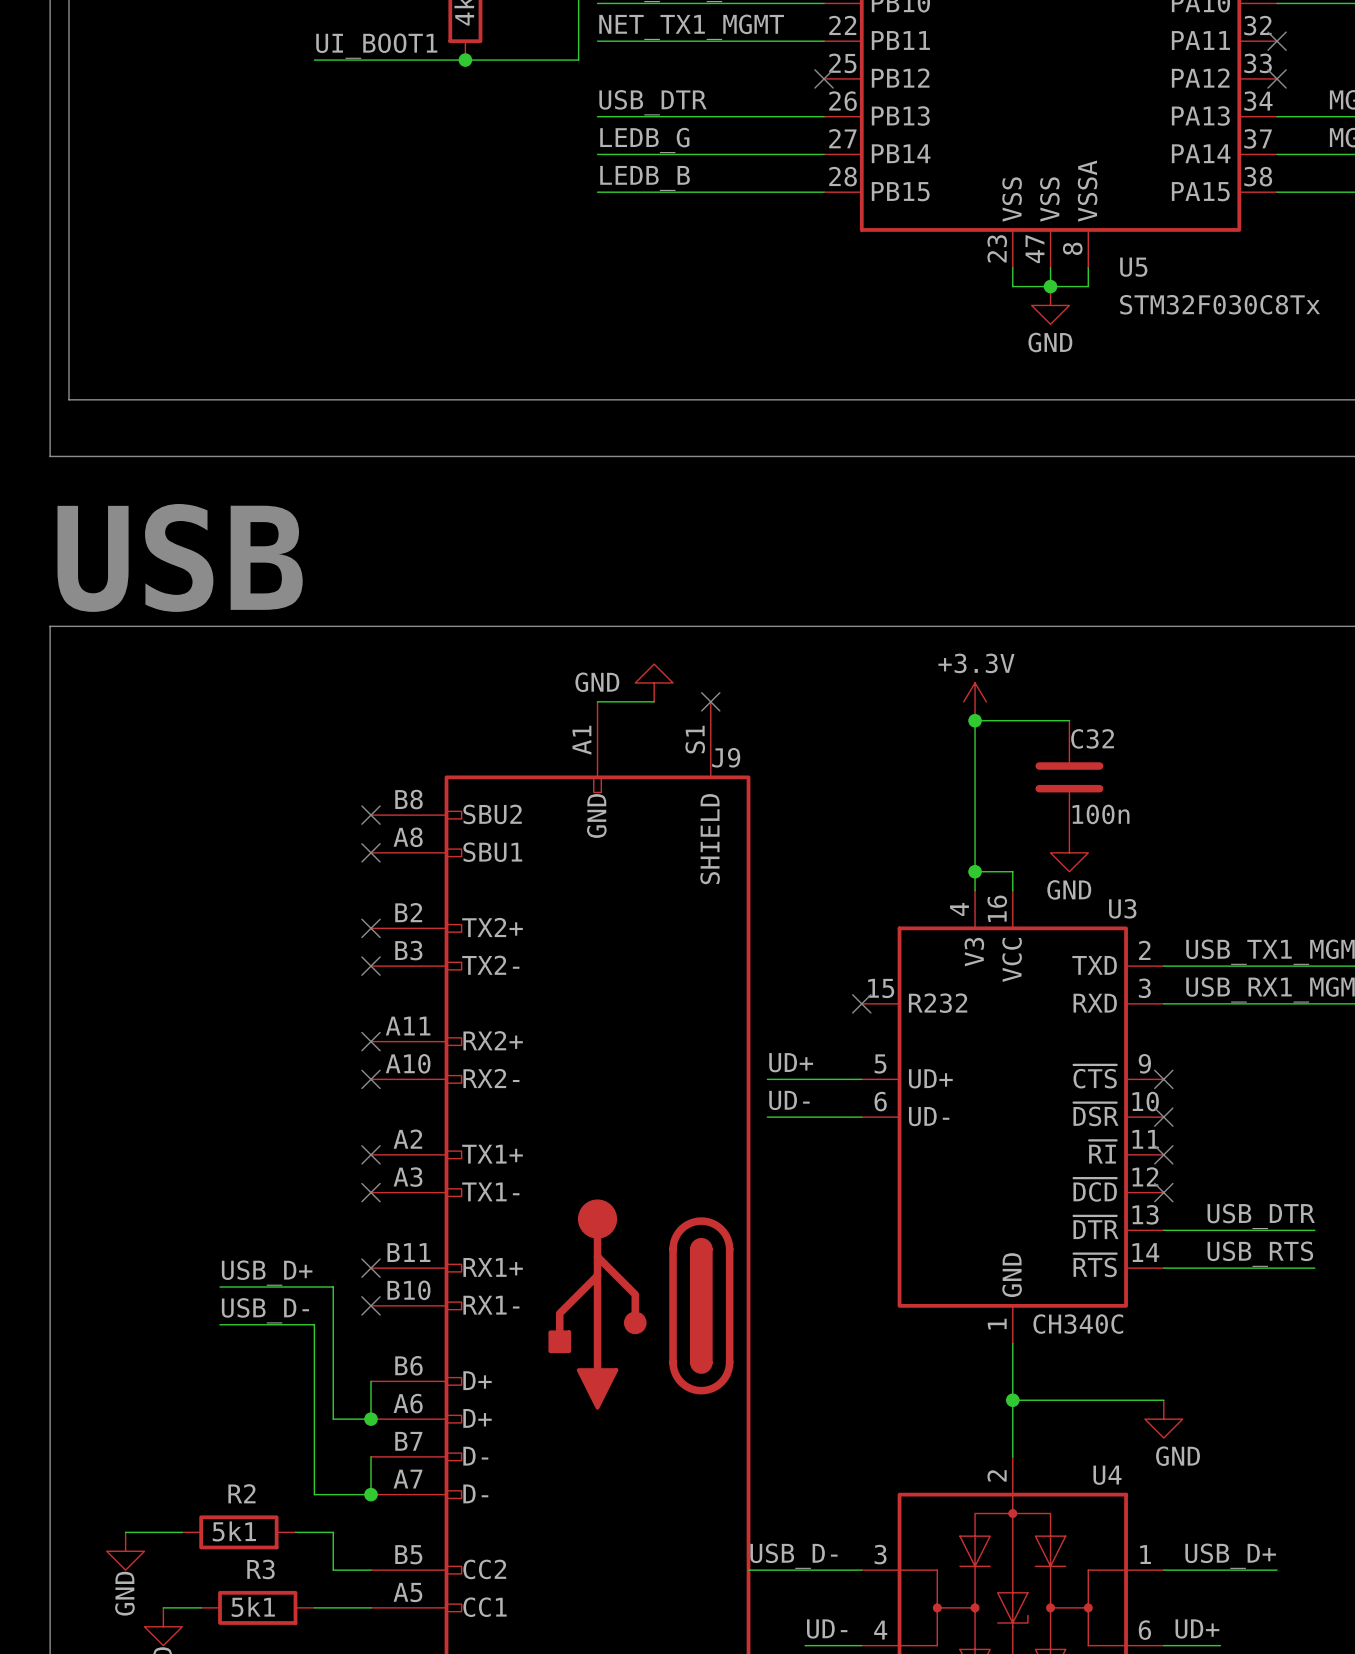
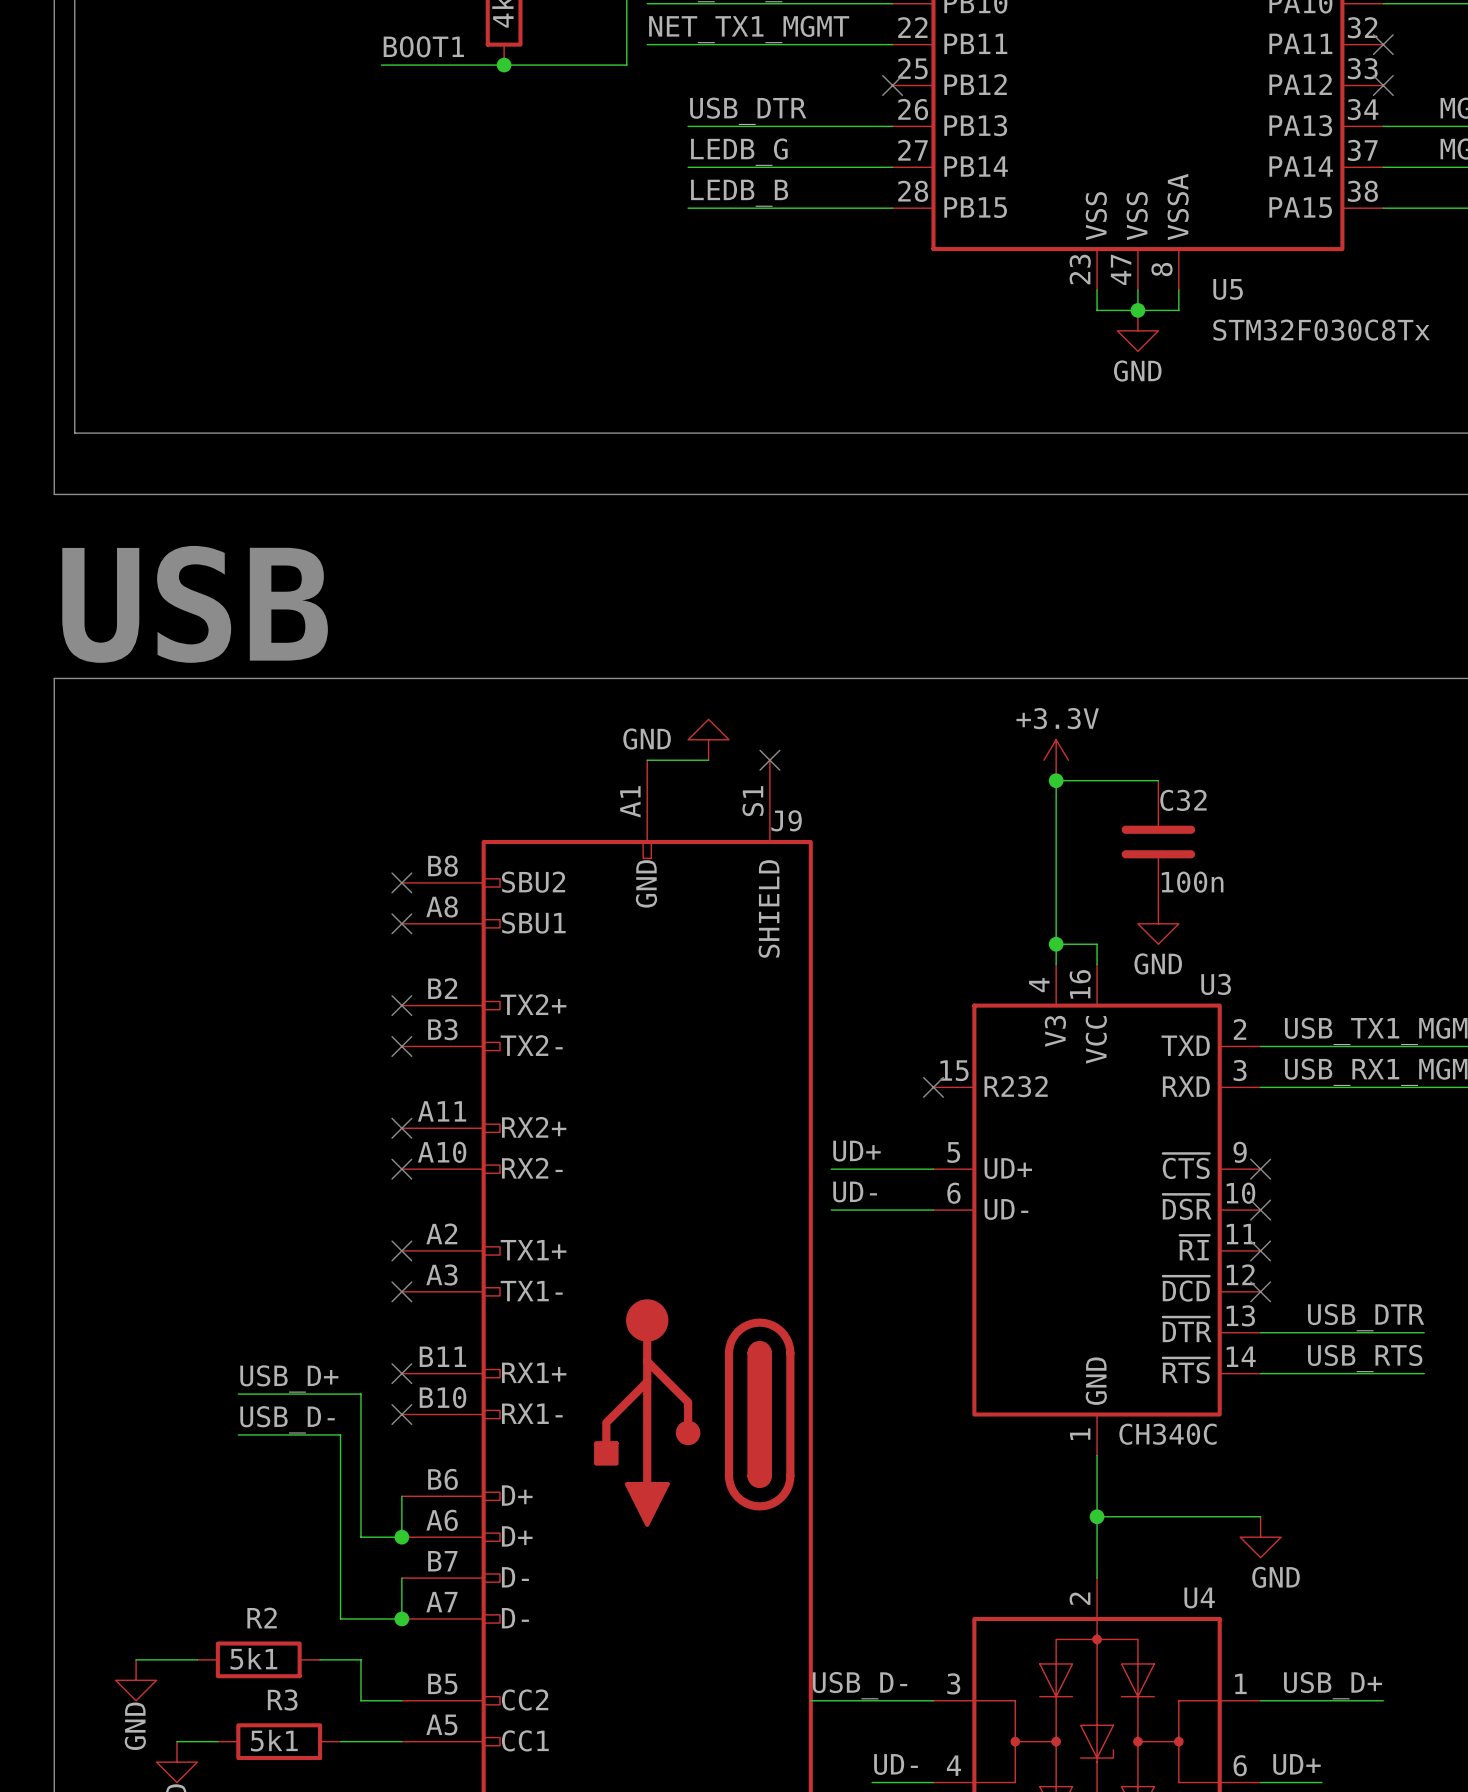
label: UI_BOOT1 (376, 46) -> BOOT1 (423, 46)
wire: (314, 60) (352, 60) -> none
label position: USB_DTR (653, 102) -> USB_DTR (748, 111)
wire: (597, 116) (635, 116) -> none
label position: LEDB_G (644, 140) -> LEDB_G (739, 152)
wire: (597, 154) (635, 154) -> none
label position: LEDB_B (645, 178) -> LEDB_B (739, 193)
wire: (597, 192) (635, 192) -> none

